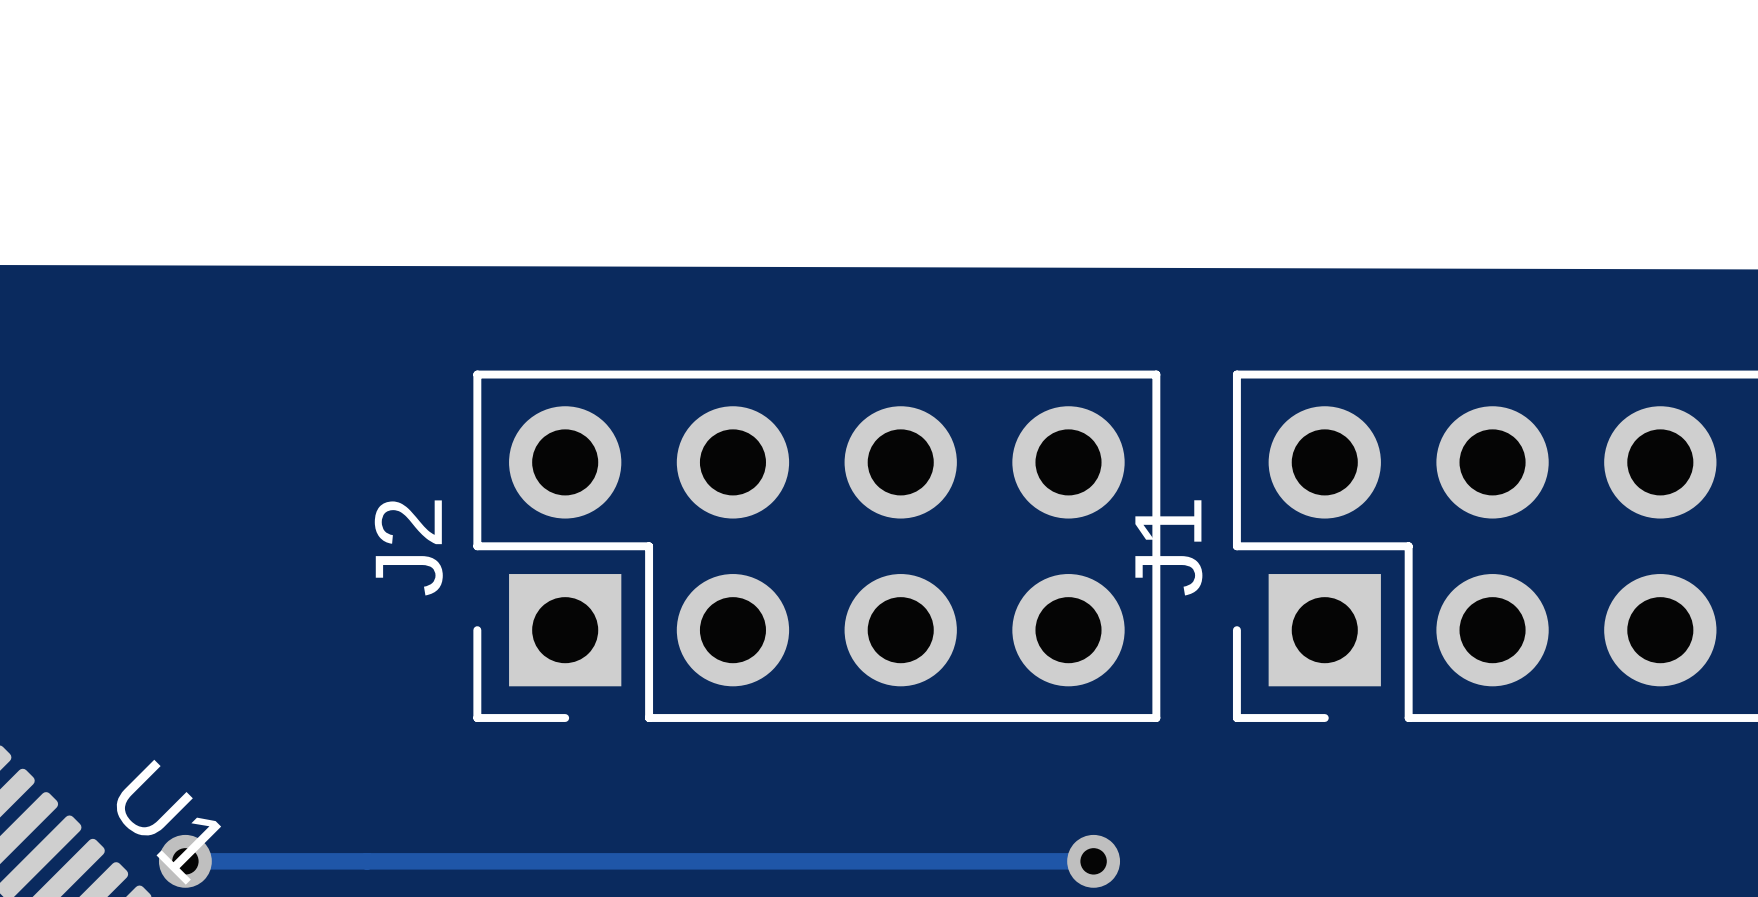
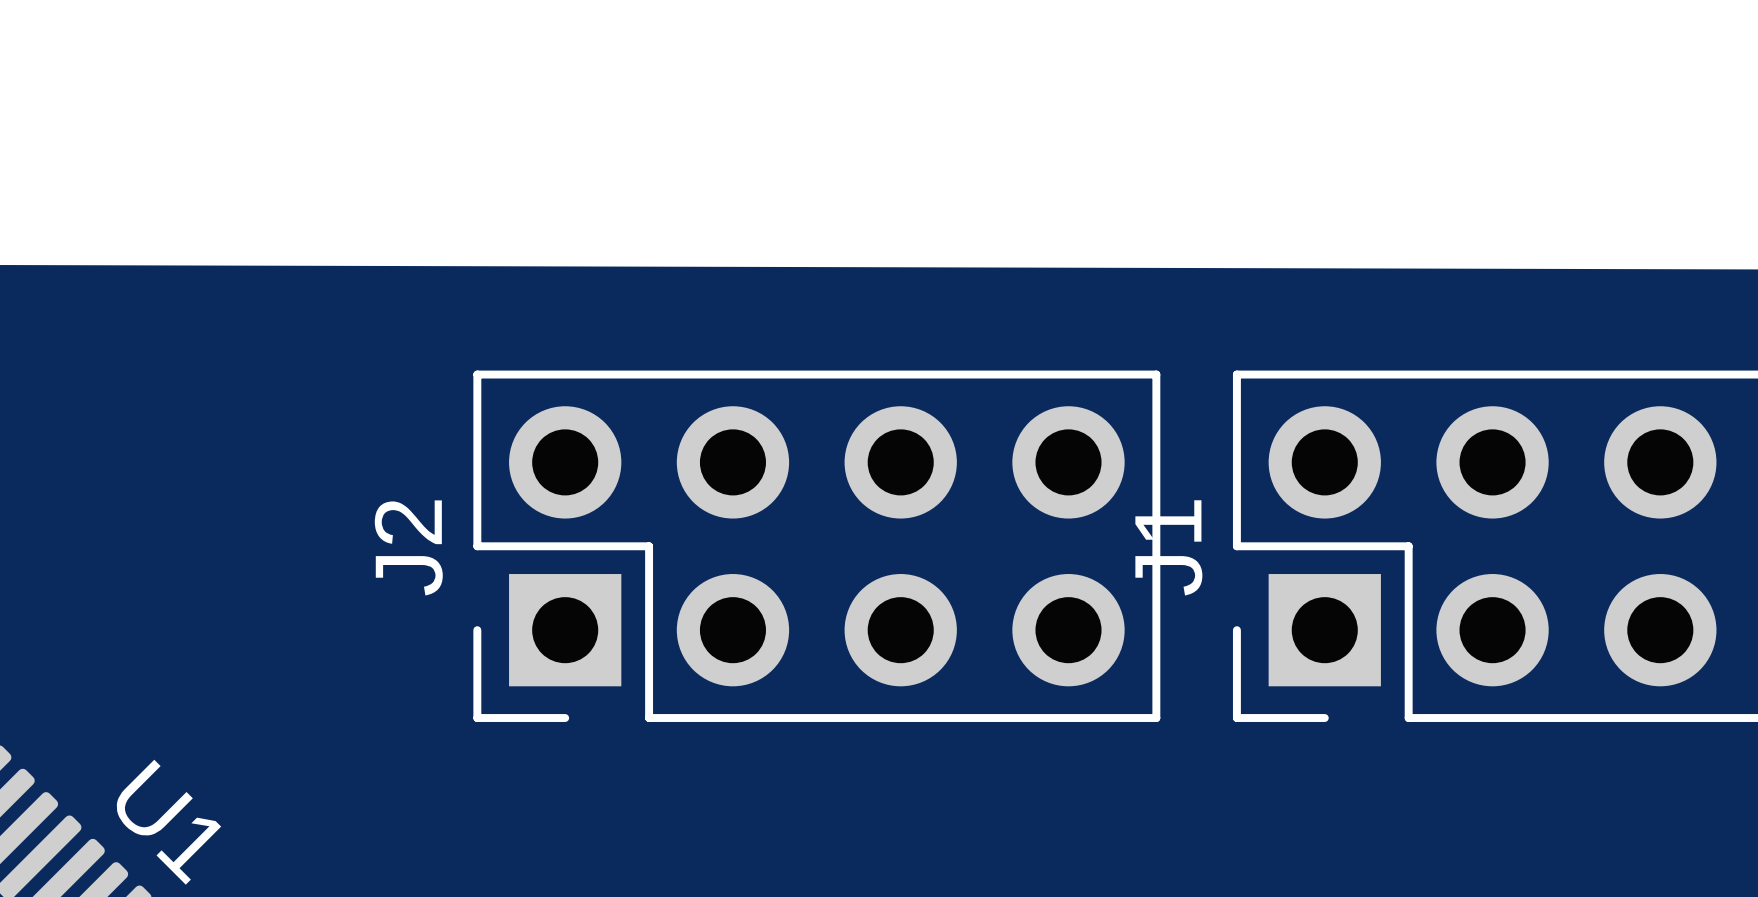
track: (185, 861) (1093, 861) -> none
via: (185, 861) -> none
via: (1093, 861) -> none

